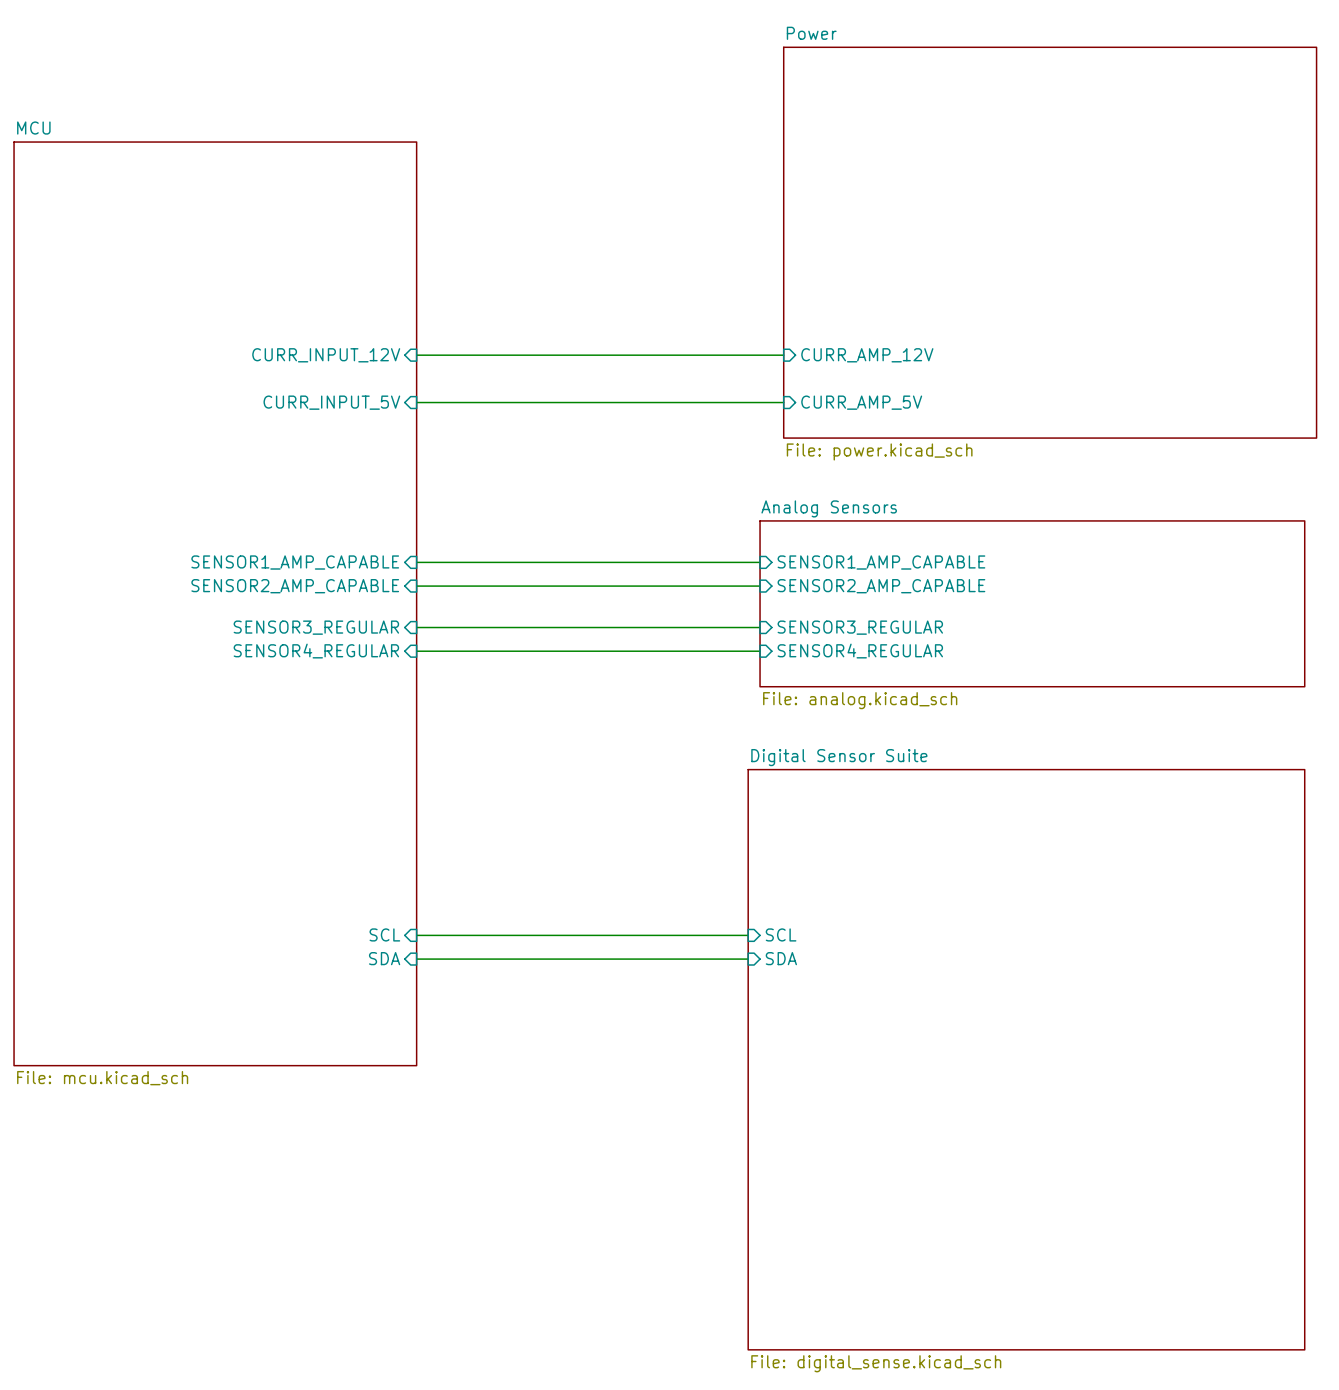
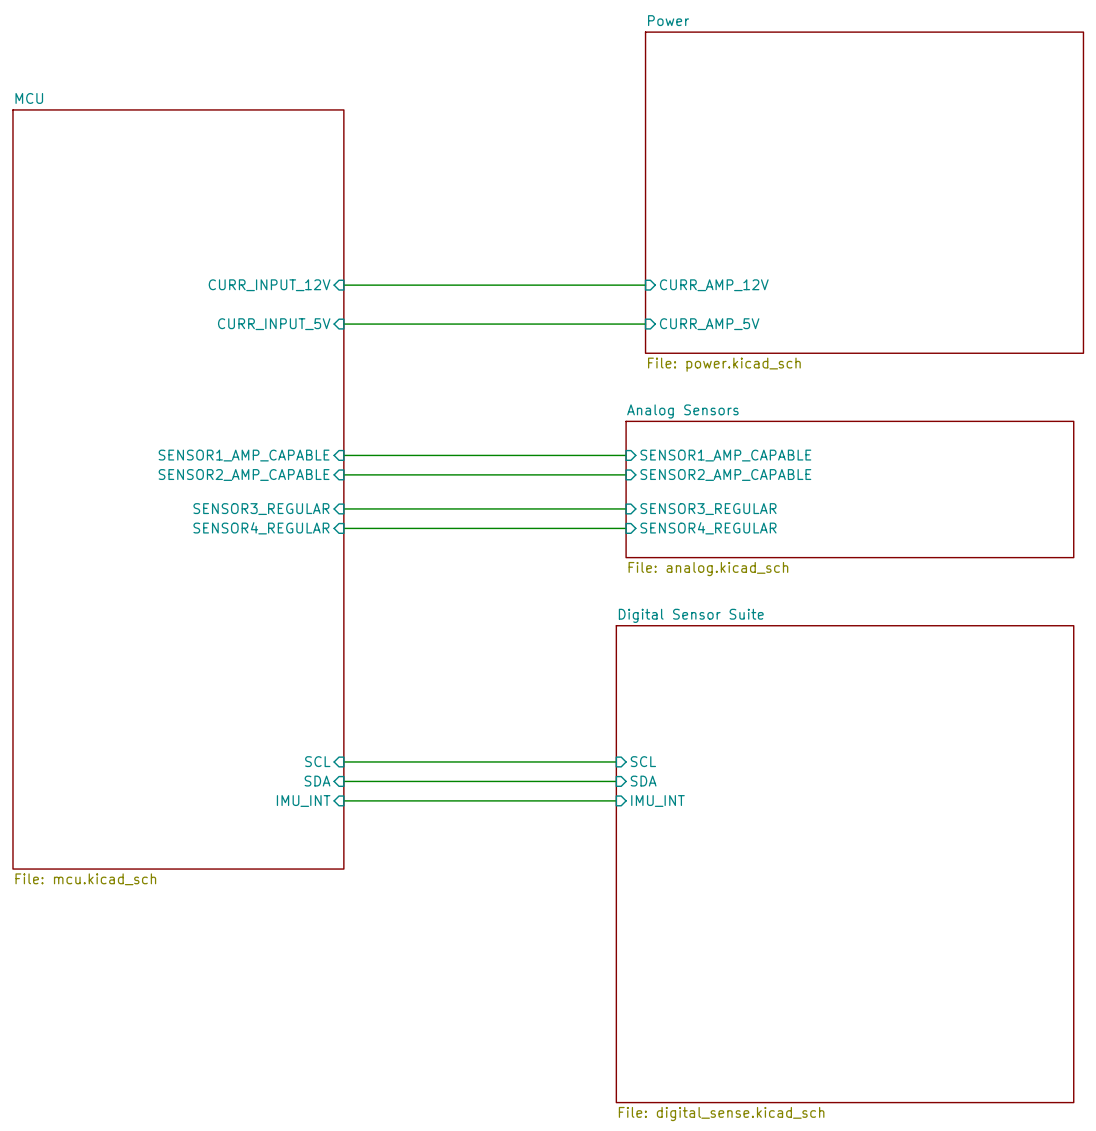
sheet pin: none -> IMU_INT (303, 801)
wire: none -> (343, 800) (616, 800)
sheet pin: none -> IMU_INT (657, 801)

